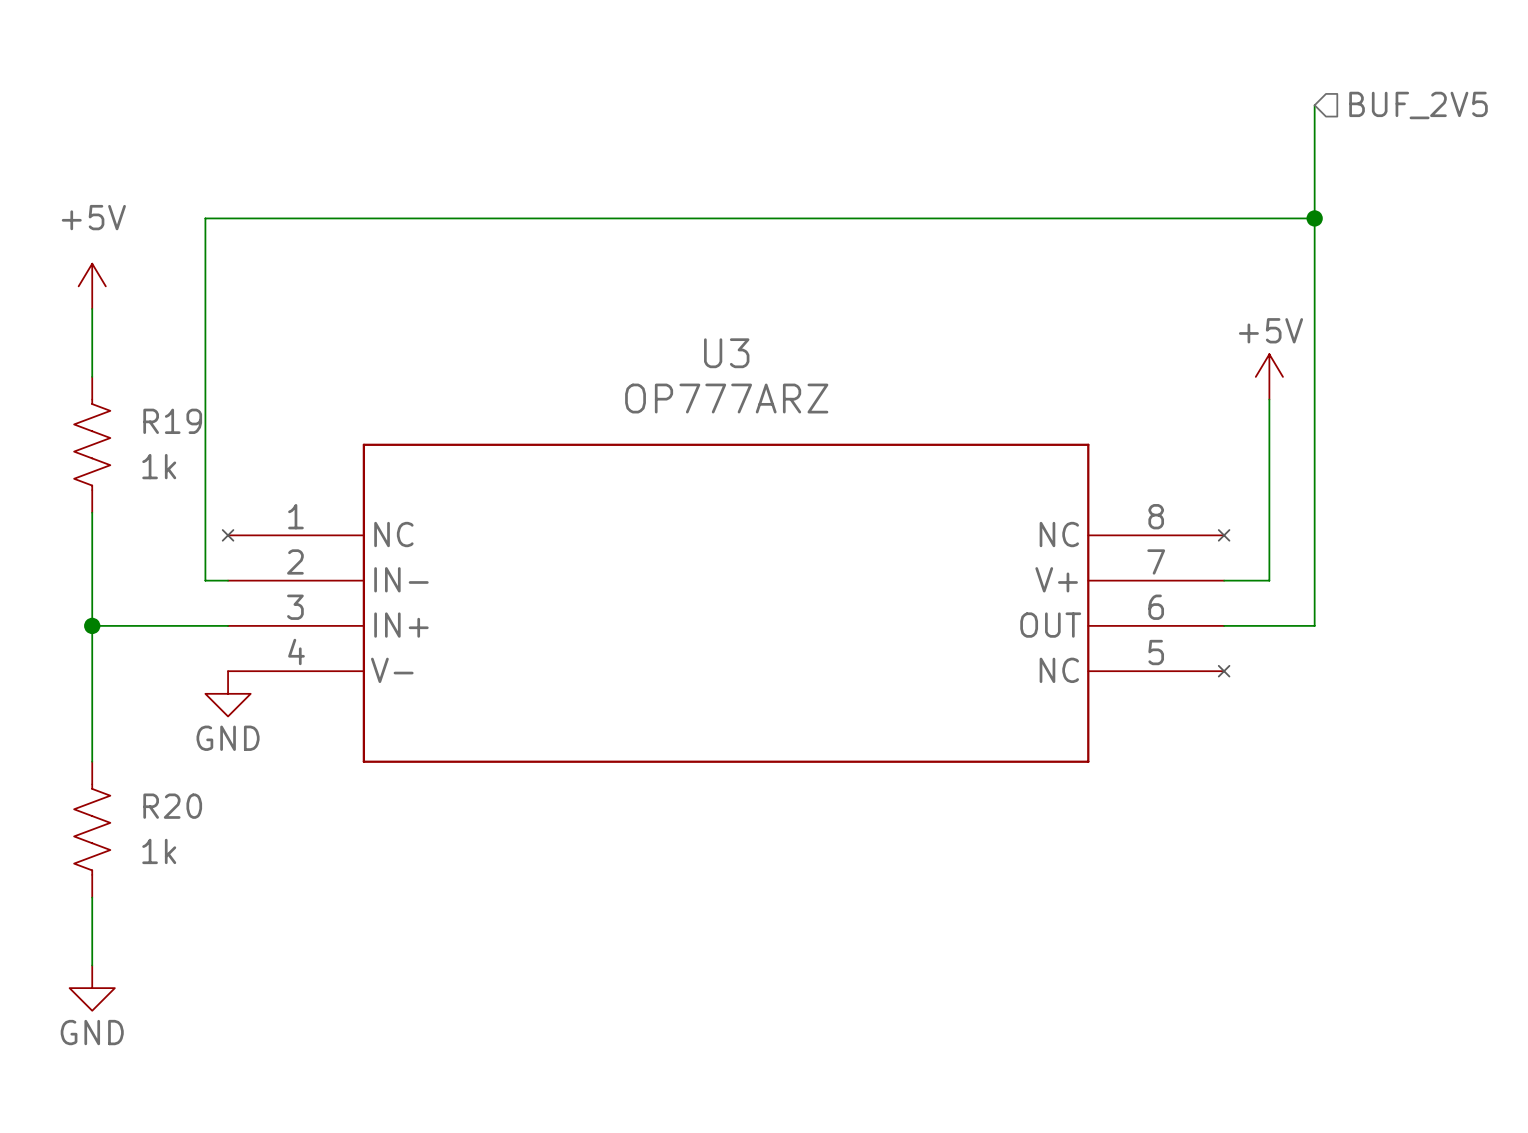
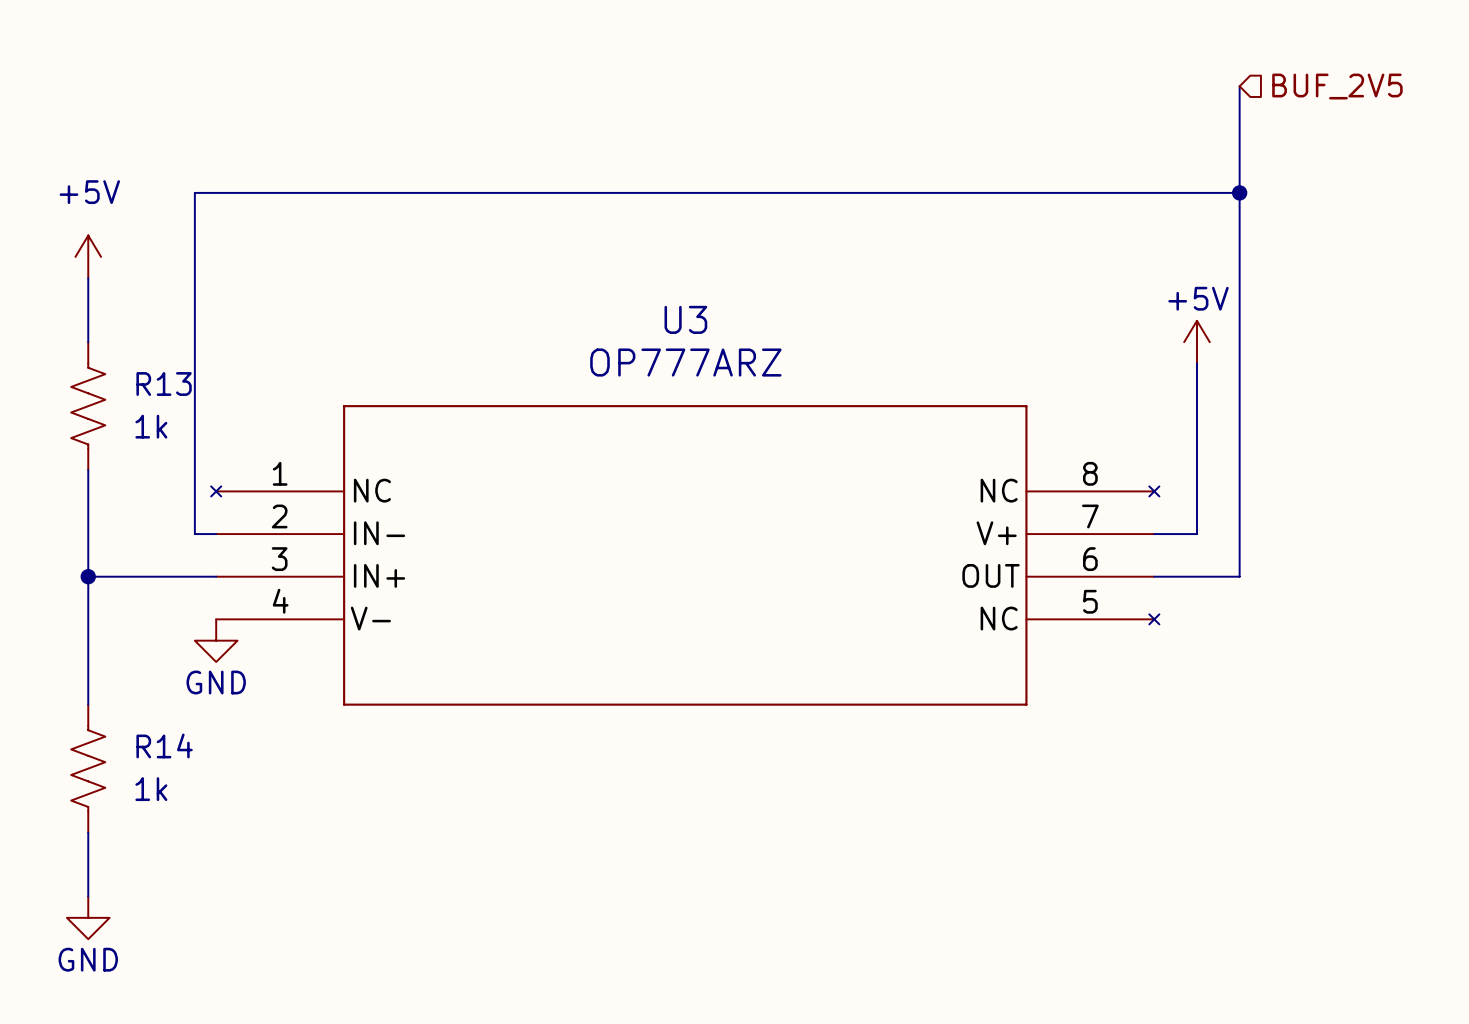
R19 name: R19 (172, 421) -> R13 (164, 384)
R20 name: R20 (172, 806) -> R14 (164, 745)

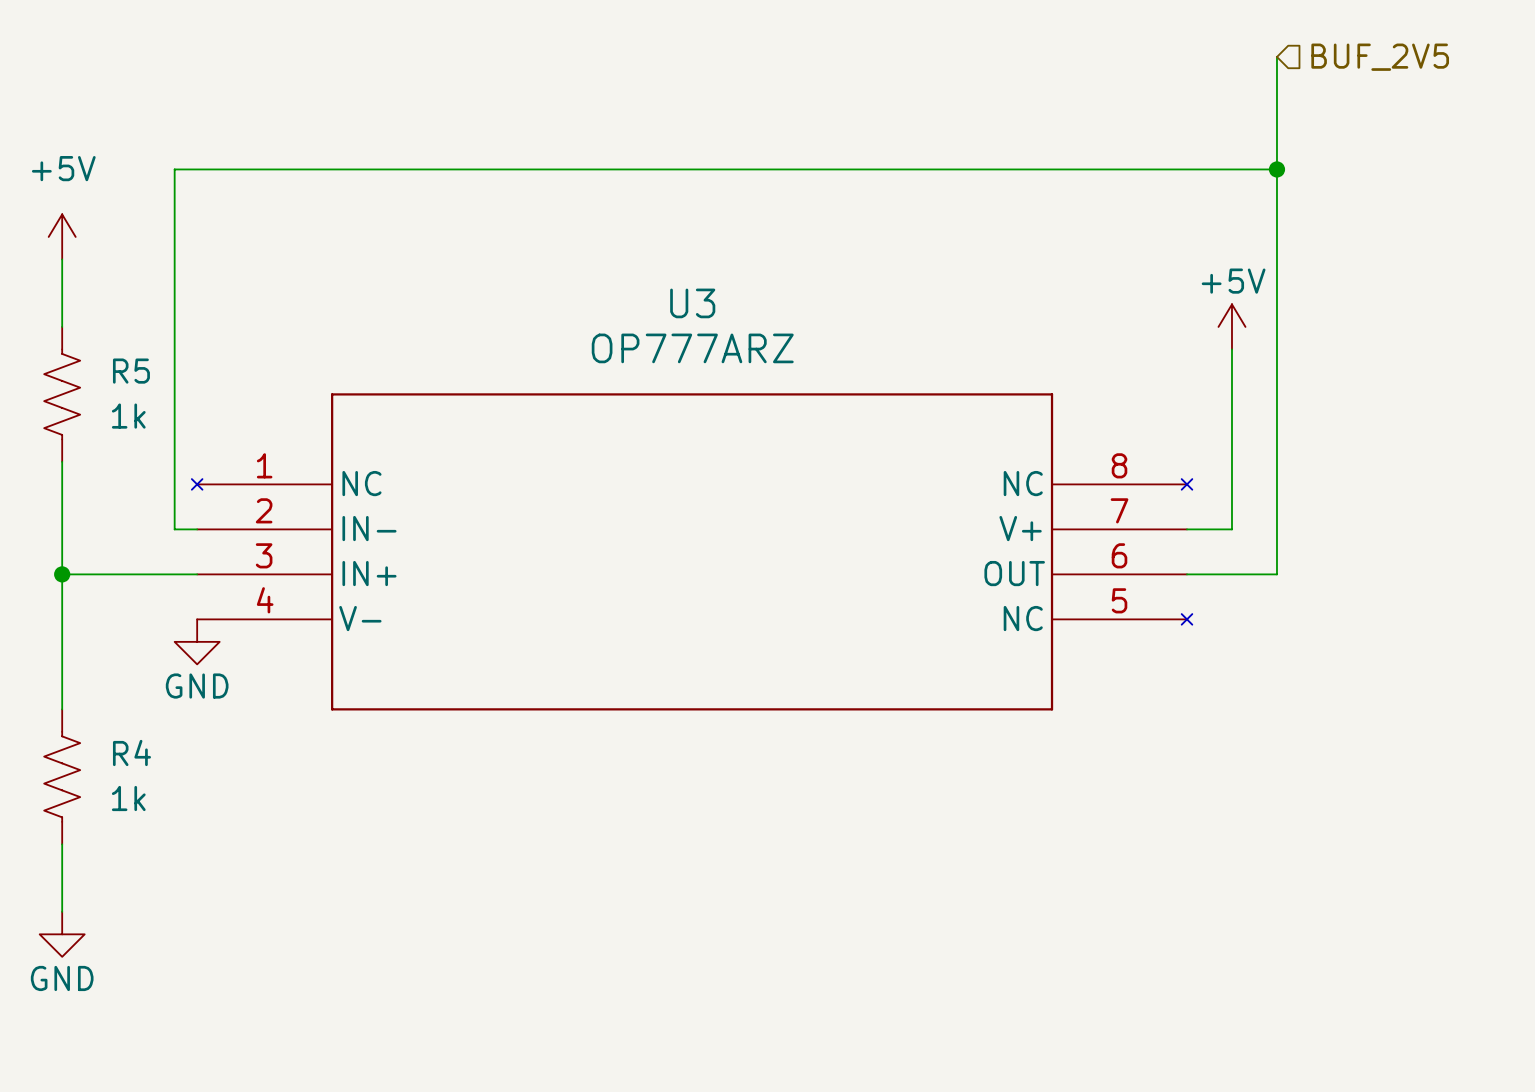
R13 name: R13 (164, 384) -> R5 (131, 371)
R14 name: R14 (164, 745) -> R4 (131, 752)

